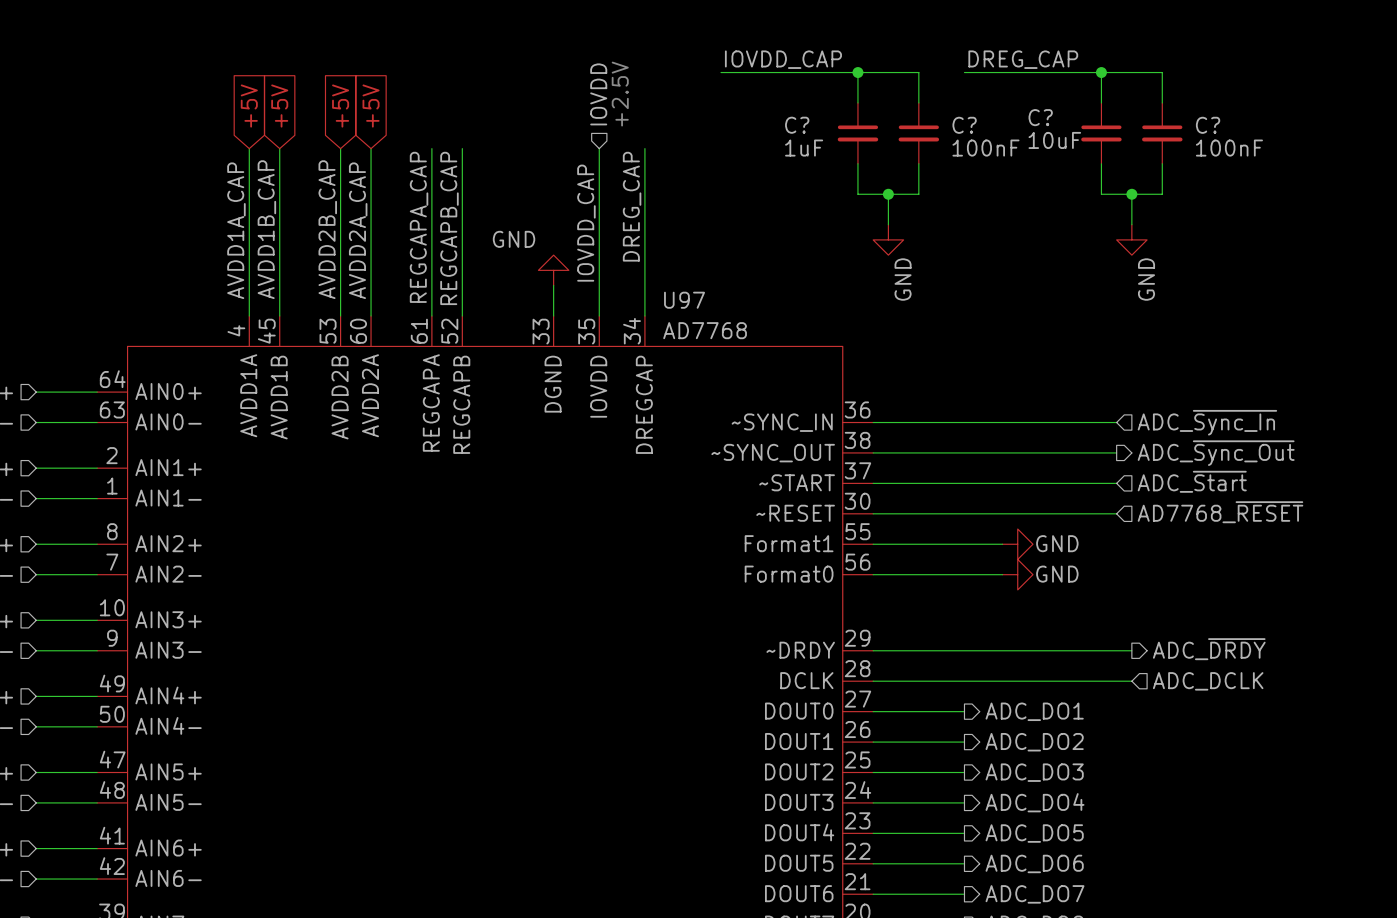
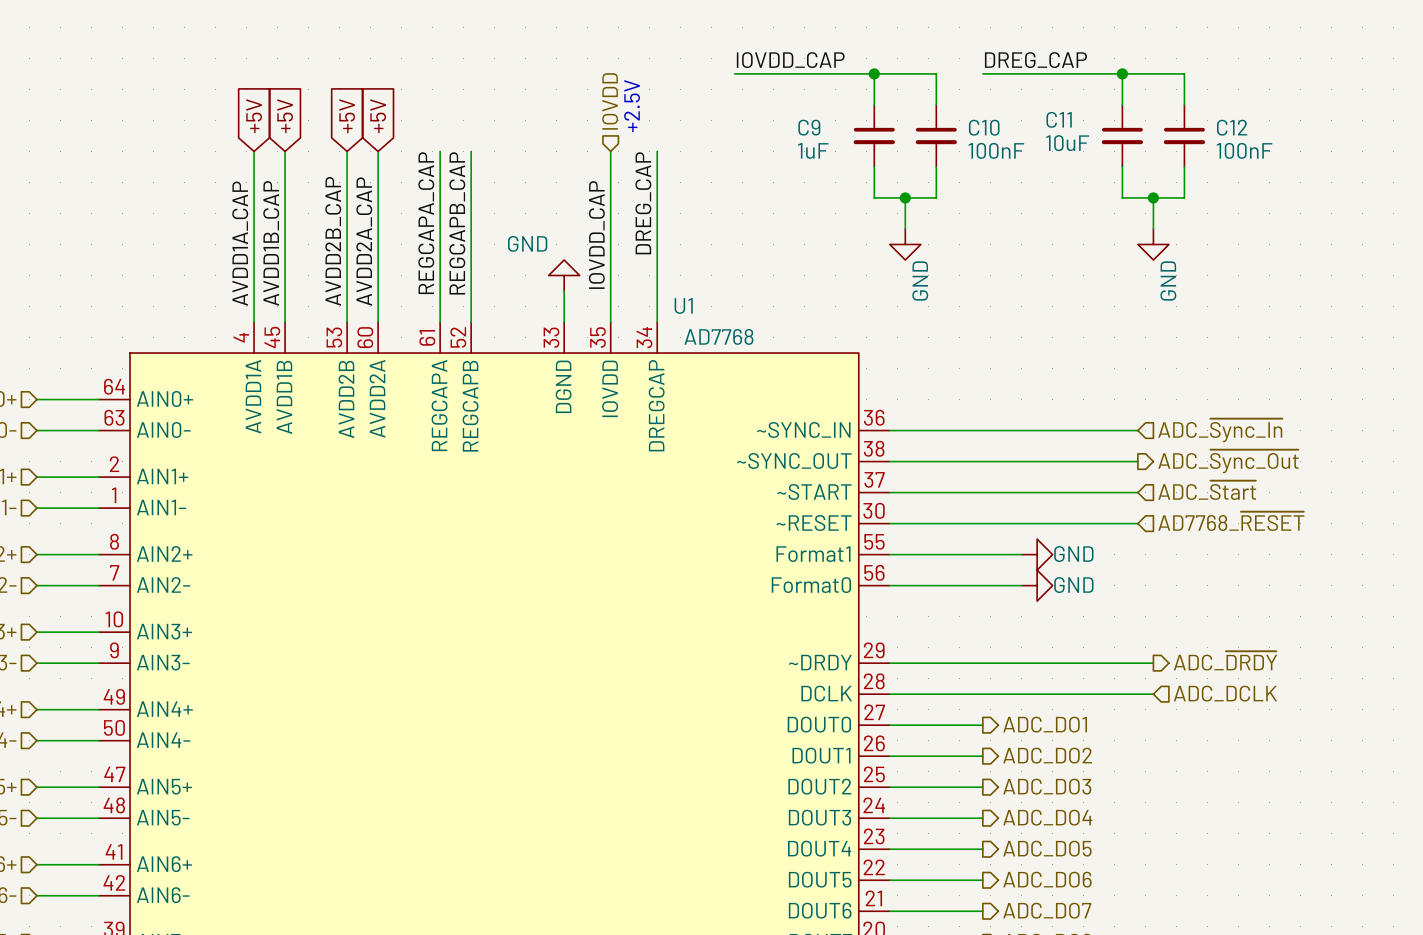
C? name: C? (1040, 117) -> C11 (1059, 119)
C? name: C? (797, 125) -> C9 (809, 127)
C? name: C? (964, 125) -> C10 (984, 127)
C? name: C? (1208, 125) -> C12 (1232, 127)
U97 name: U97 (684, 300) -> U1 (683, 306)

